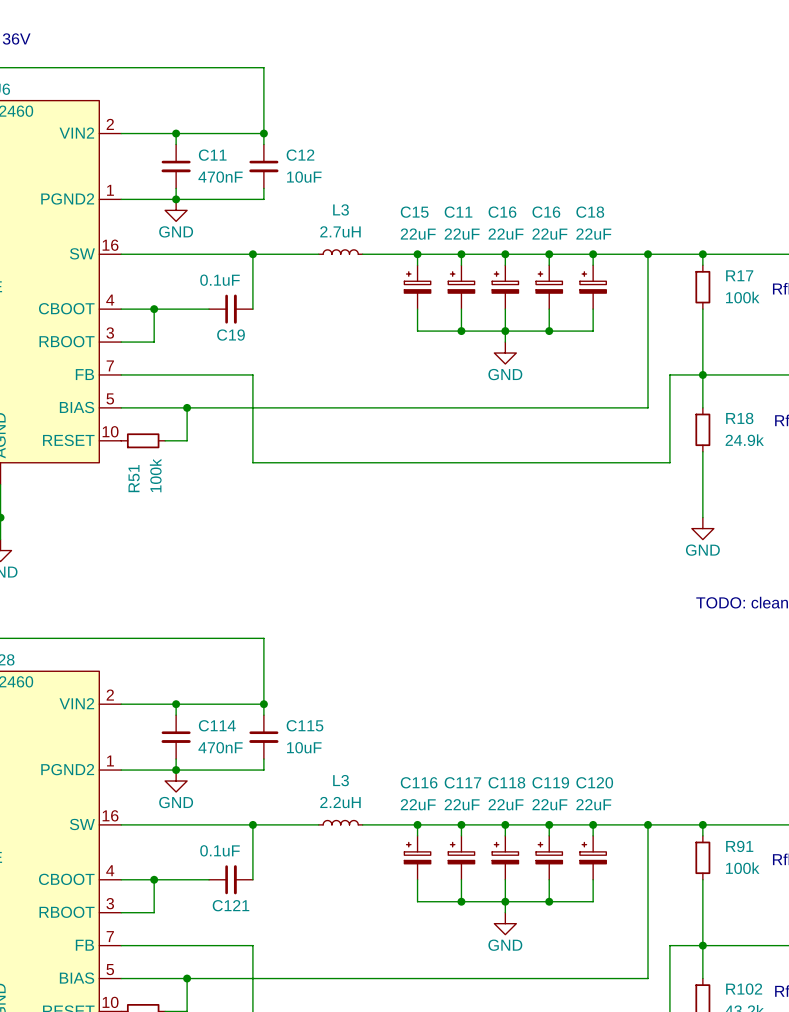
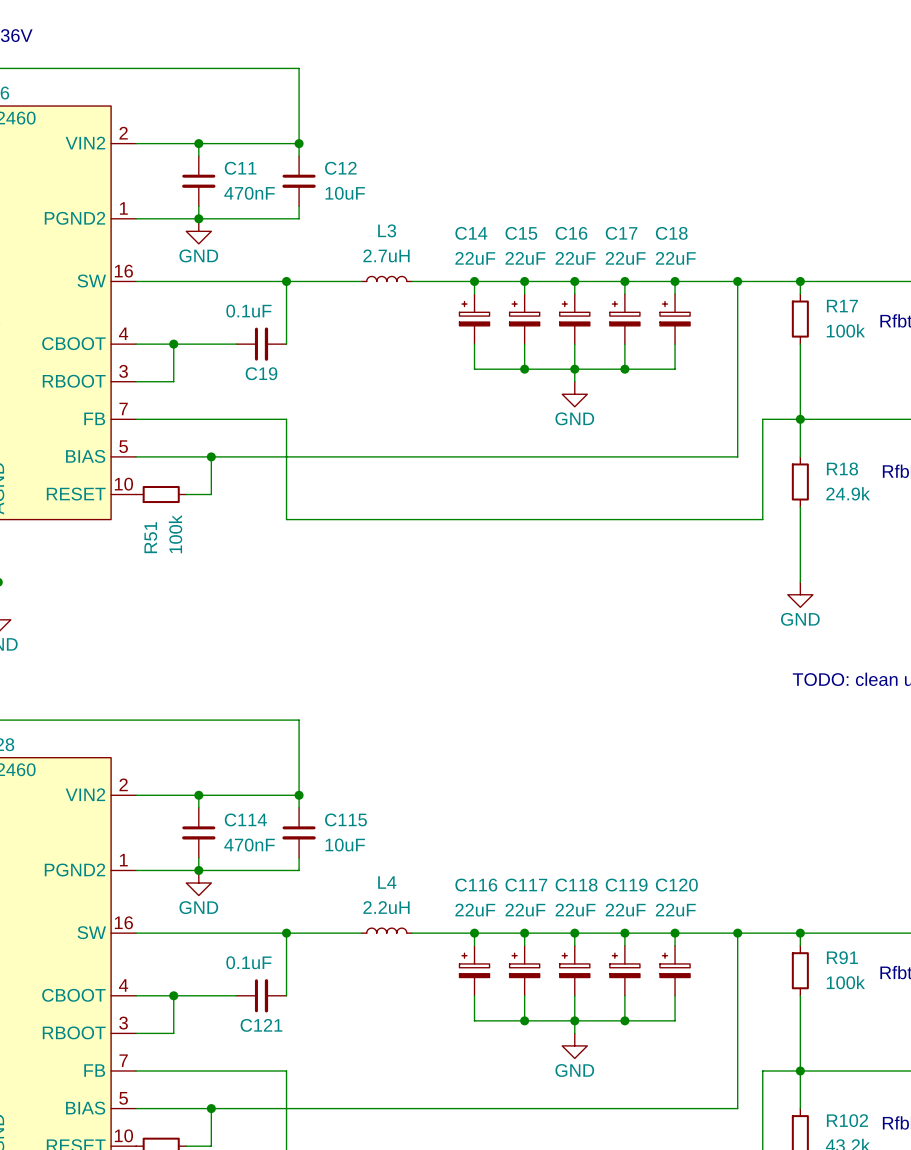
C15 name: C15 (414, 212) -> C14 (471, 233)
C11 name: C11 (458, 212) -> C15 (521, 233)
C16 name: C16 (546, 212) -> C17 (621, 233)
L3 name: L3 (341, 780) -> L4 (387, 882)

